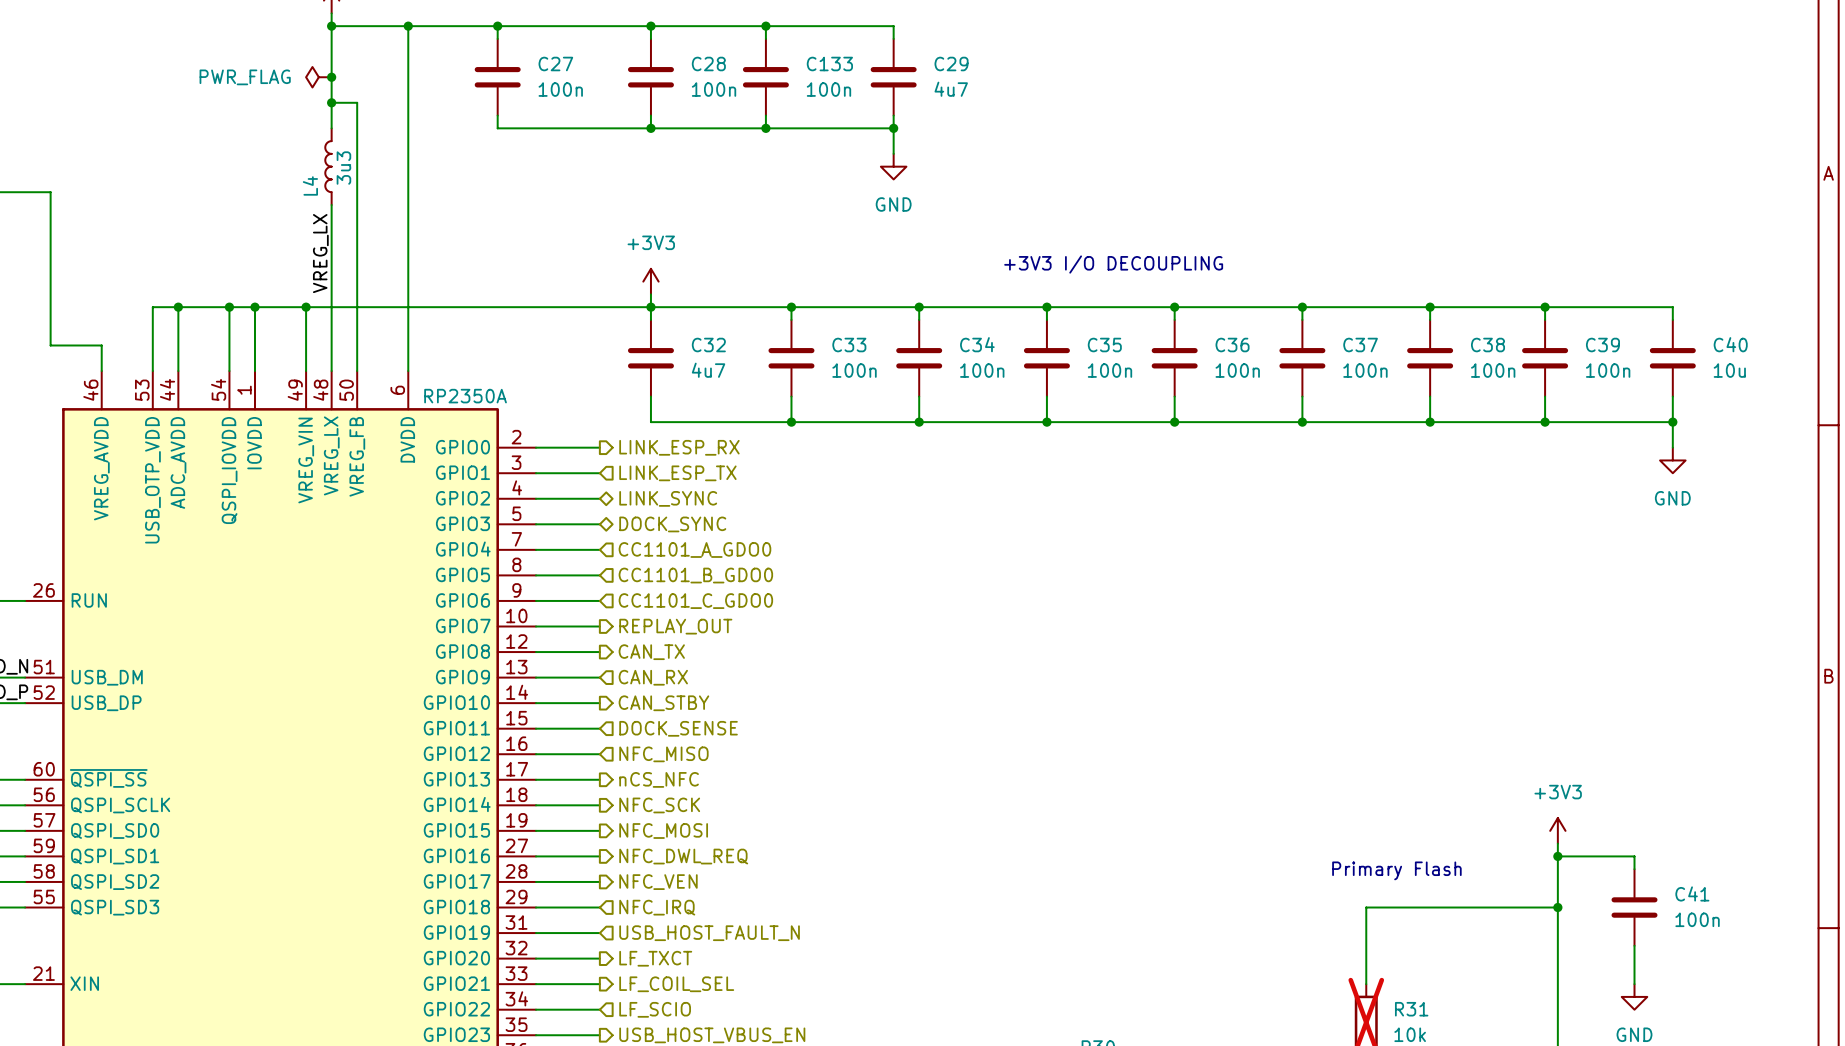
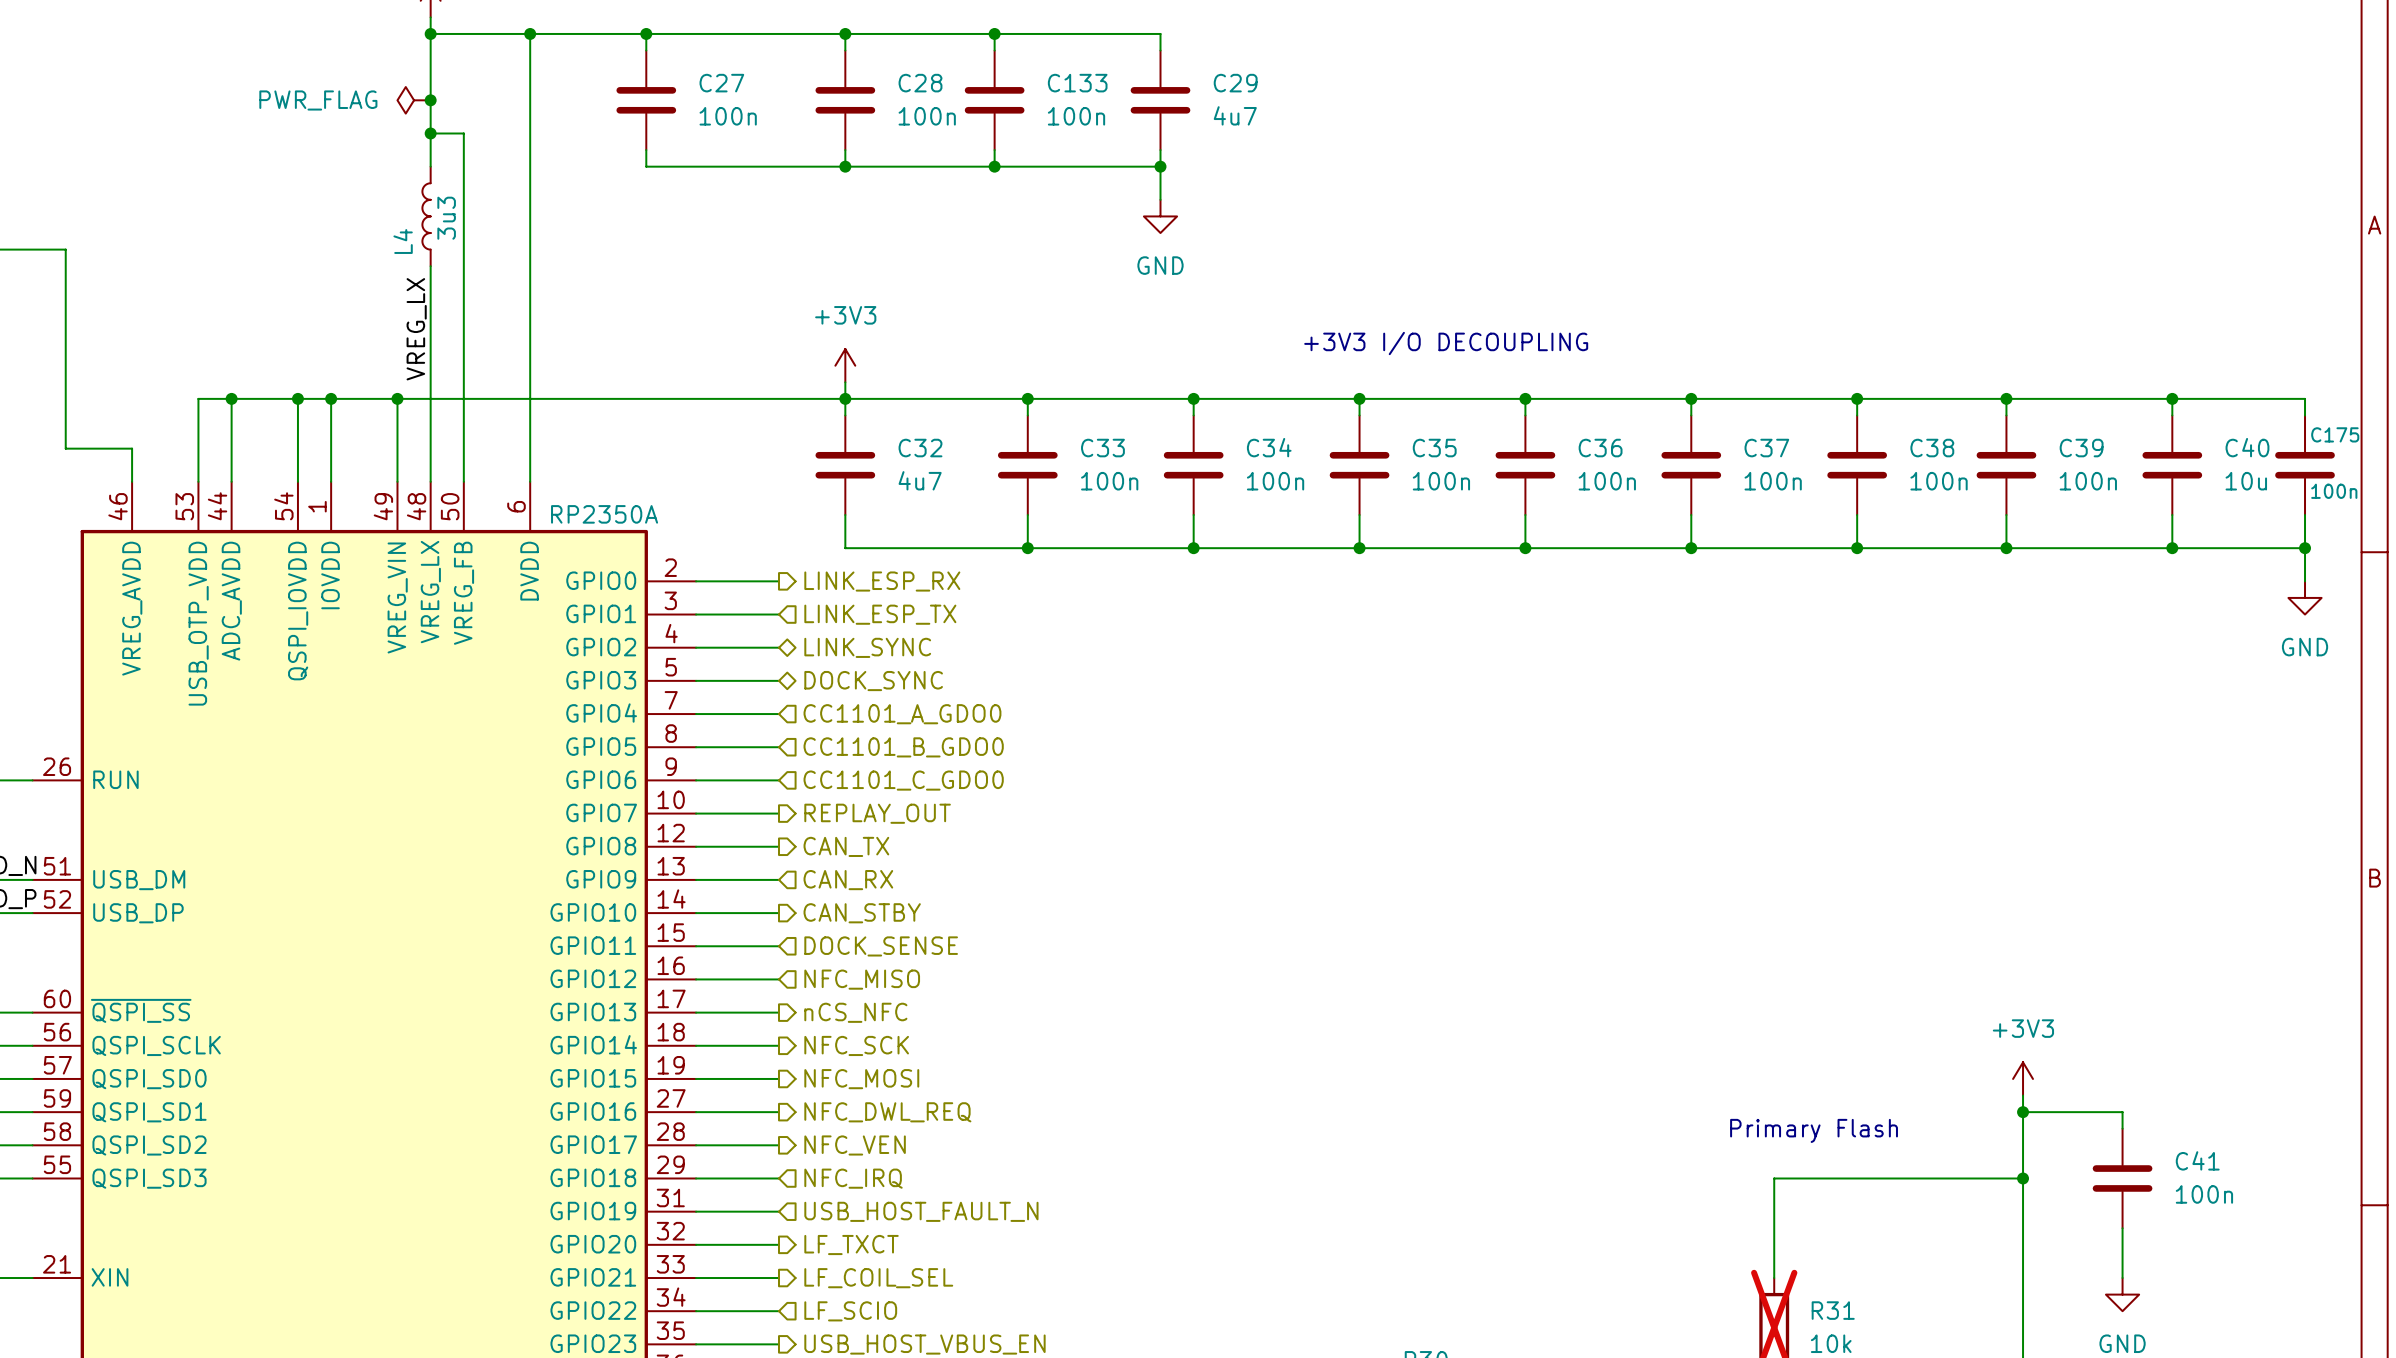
wire: none -> (2172, 398) (2305, 398) (2305, 415)
junction: none -> (2172, 398)
C175: none -> 100n (2305, 465)
wire: none -> (2305, 515) (2305, 581)
wire: (1672, 422) (1672, 447) -> (2172, 548) (2305, 548)
junction: none -> (2305, 548)
power symbol position: GND (1672, 460) -> GND (2305, 597)

